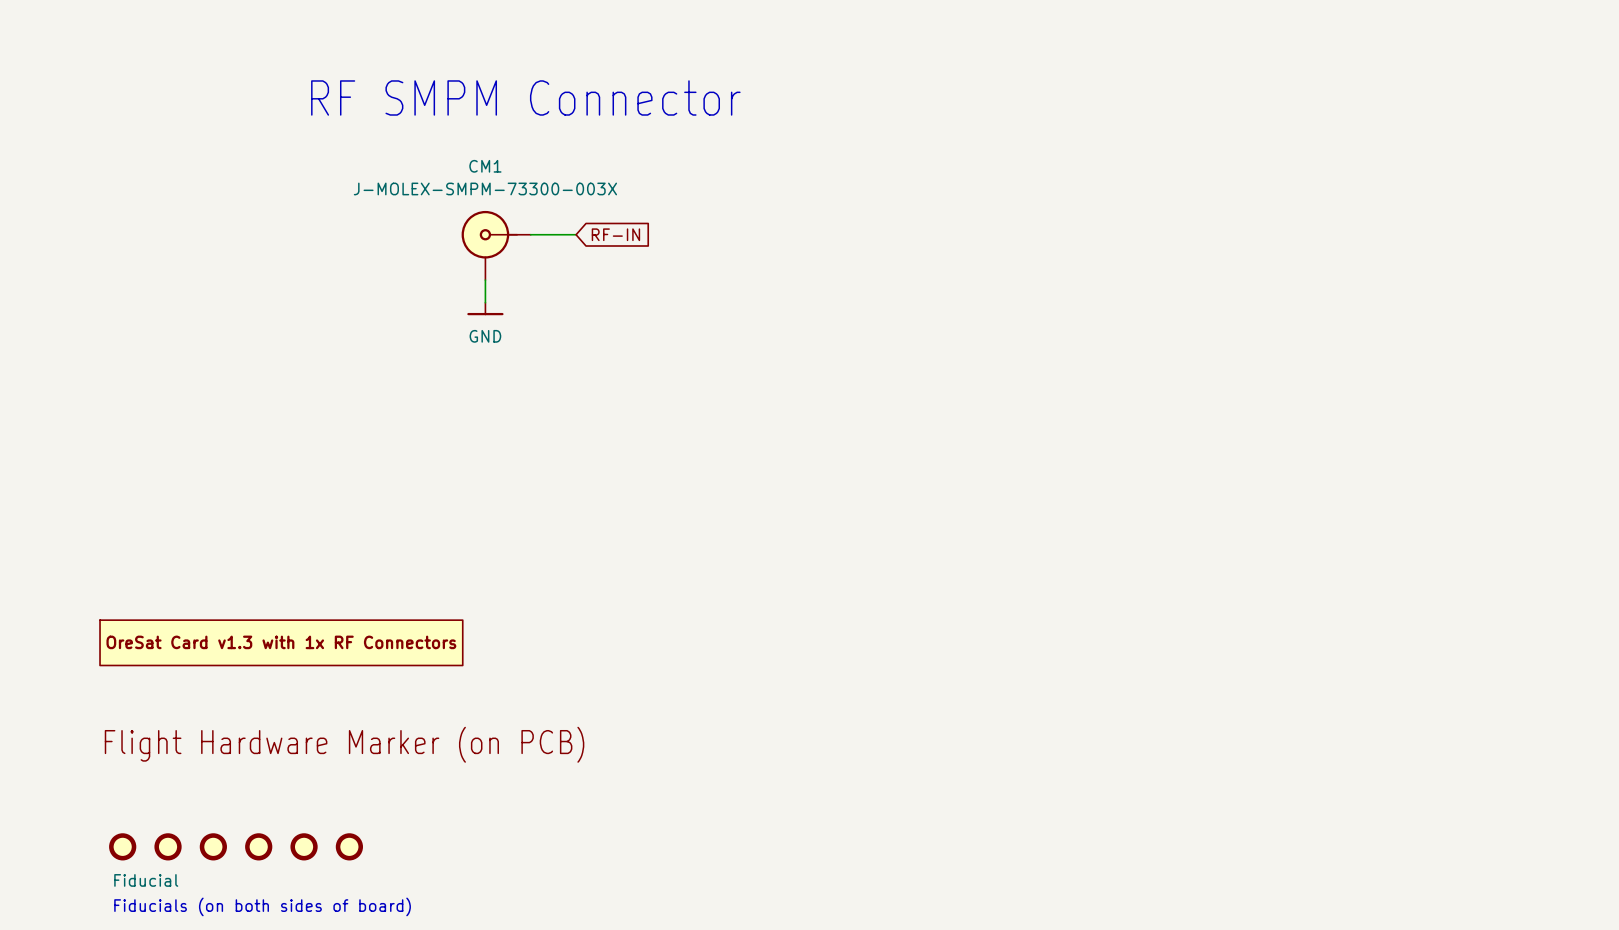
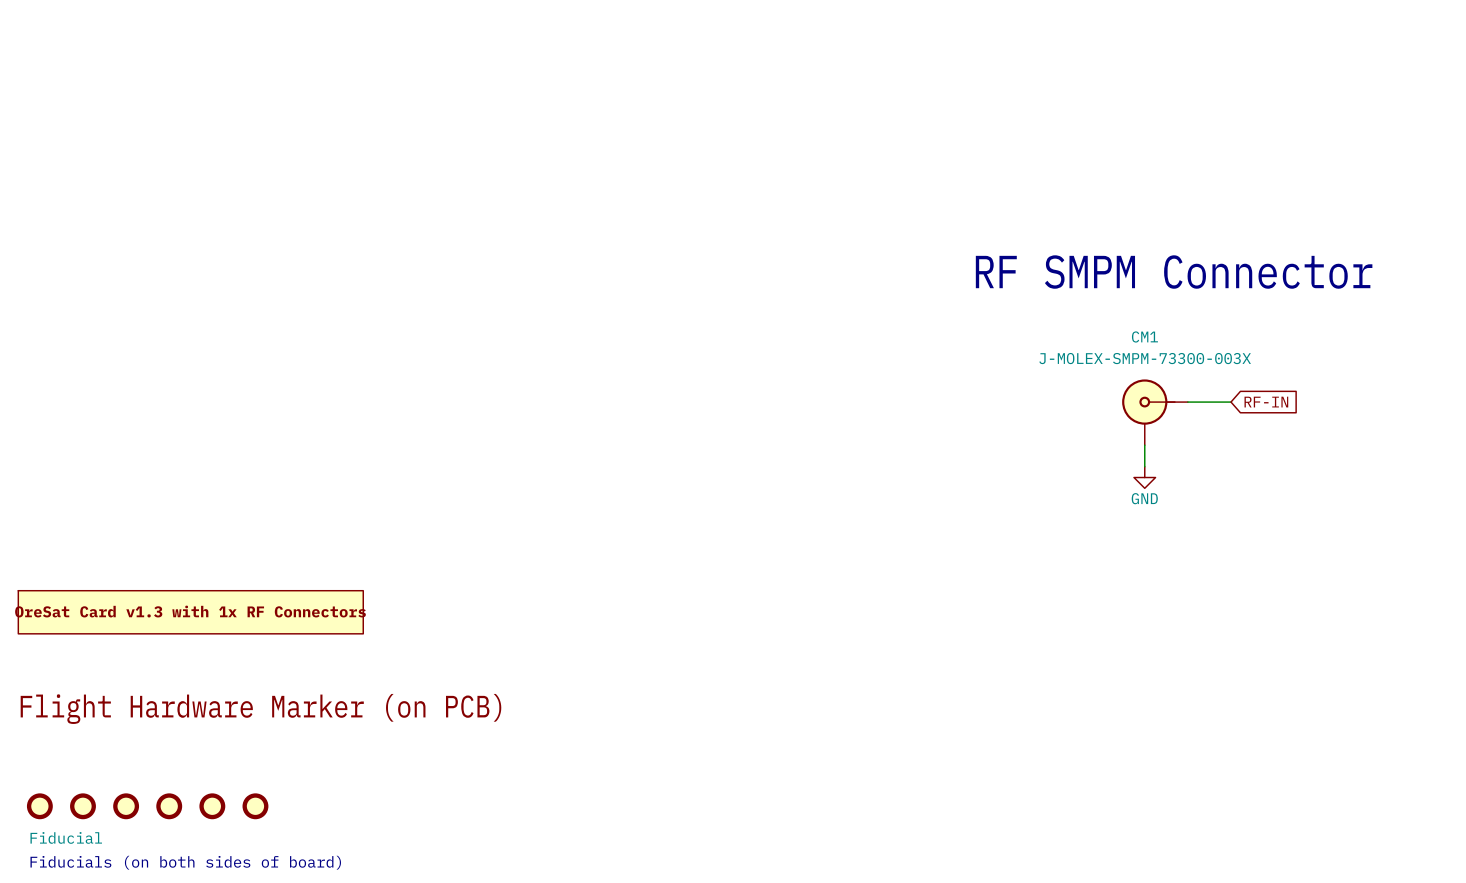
text: RF SMPM Connector (525, 97) -> none
wire: (530, 234) (576, 234) -> none
global label: RF-IN (615, 234) -> none
CM1 position: (496, 245) -> (1155, 412)
wire: (485, 280) (485, 302) -> none
text: none -> RF SMPM Connector (1174, 272)
power symbol: GND (485, 308) -> none
wire: none -> (1187, 402) (1231, 402)
global label: none -> RF-IN (1266, 402)
wire: none -> (1144, 445) (1144, 466)
power symbol: none -> GND (1144, 477)

